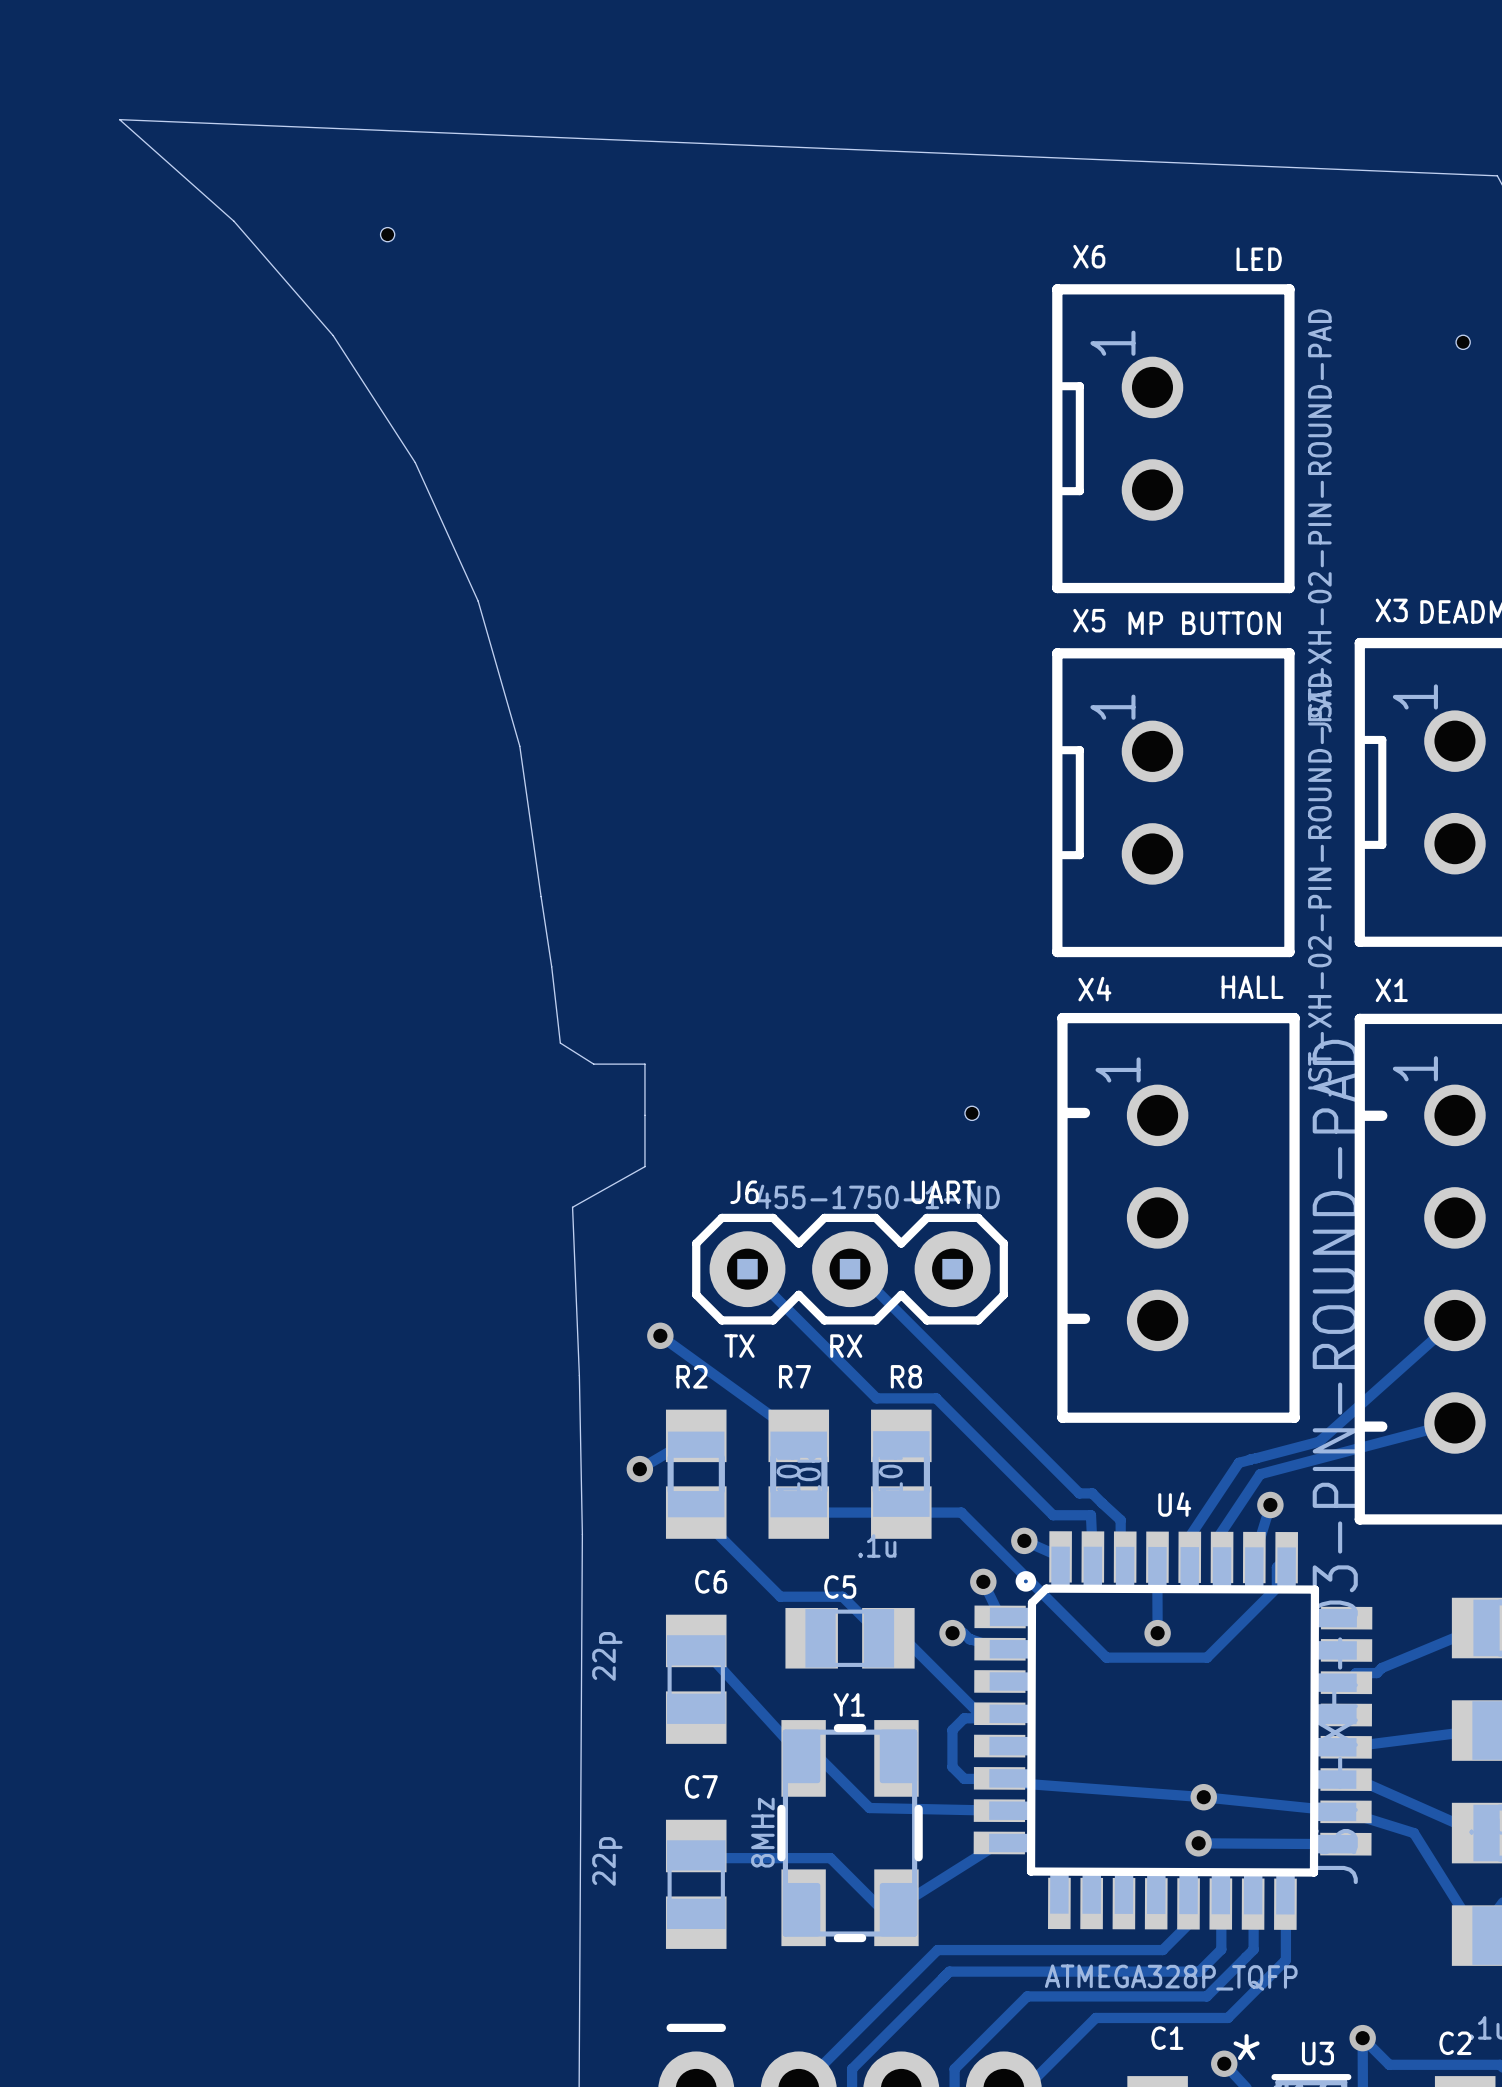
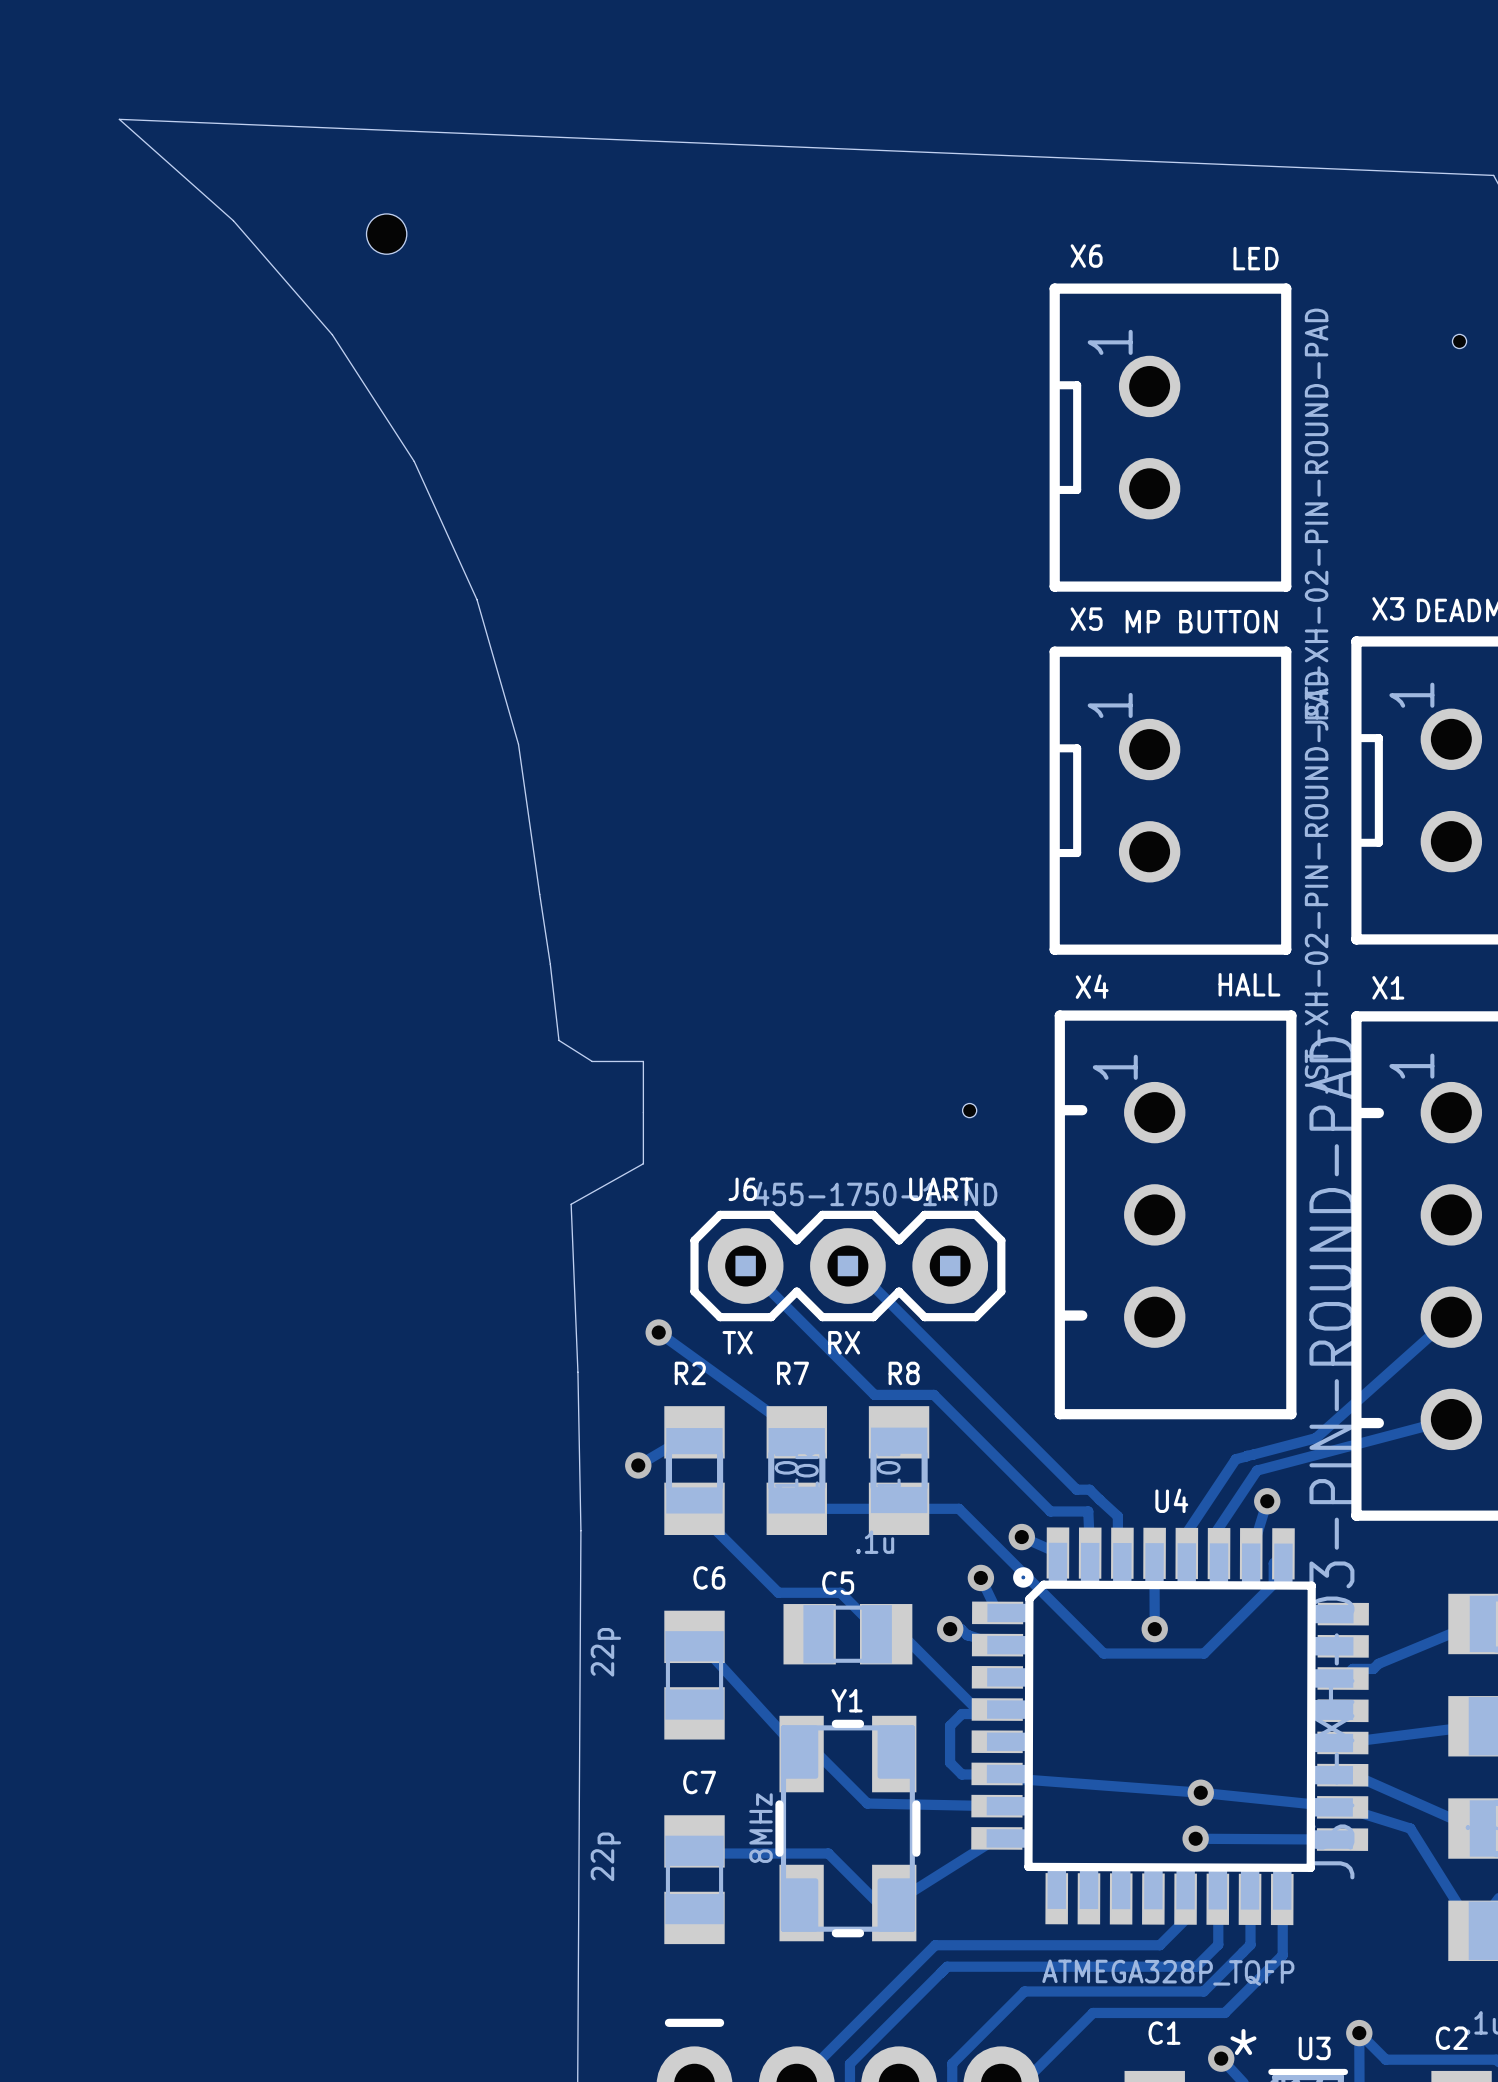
hole size: [380, 227, 395, 242] -> [366, 213, 407, 255]

